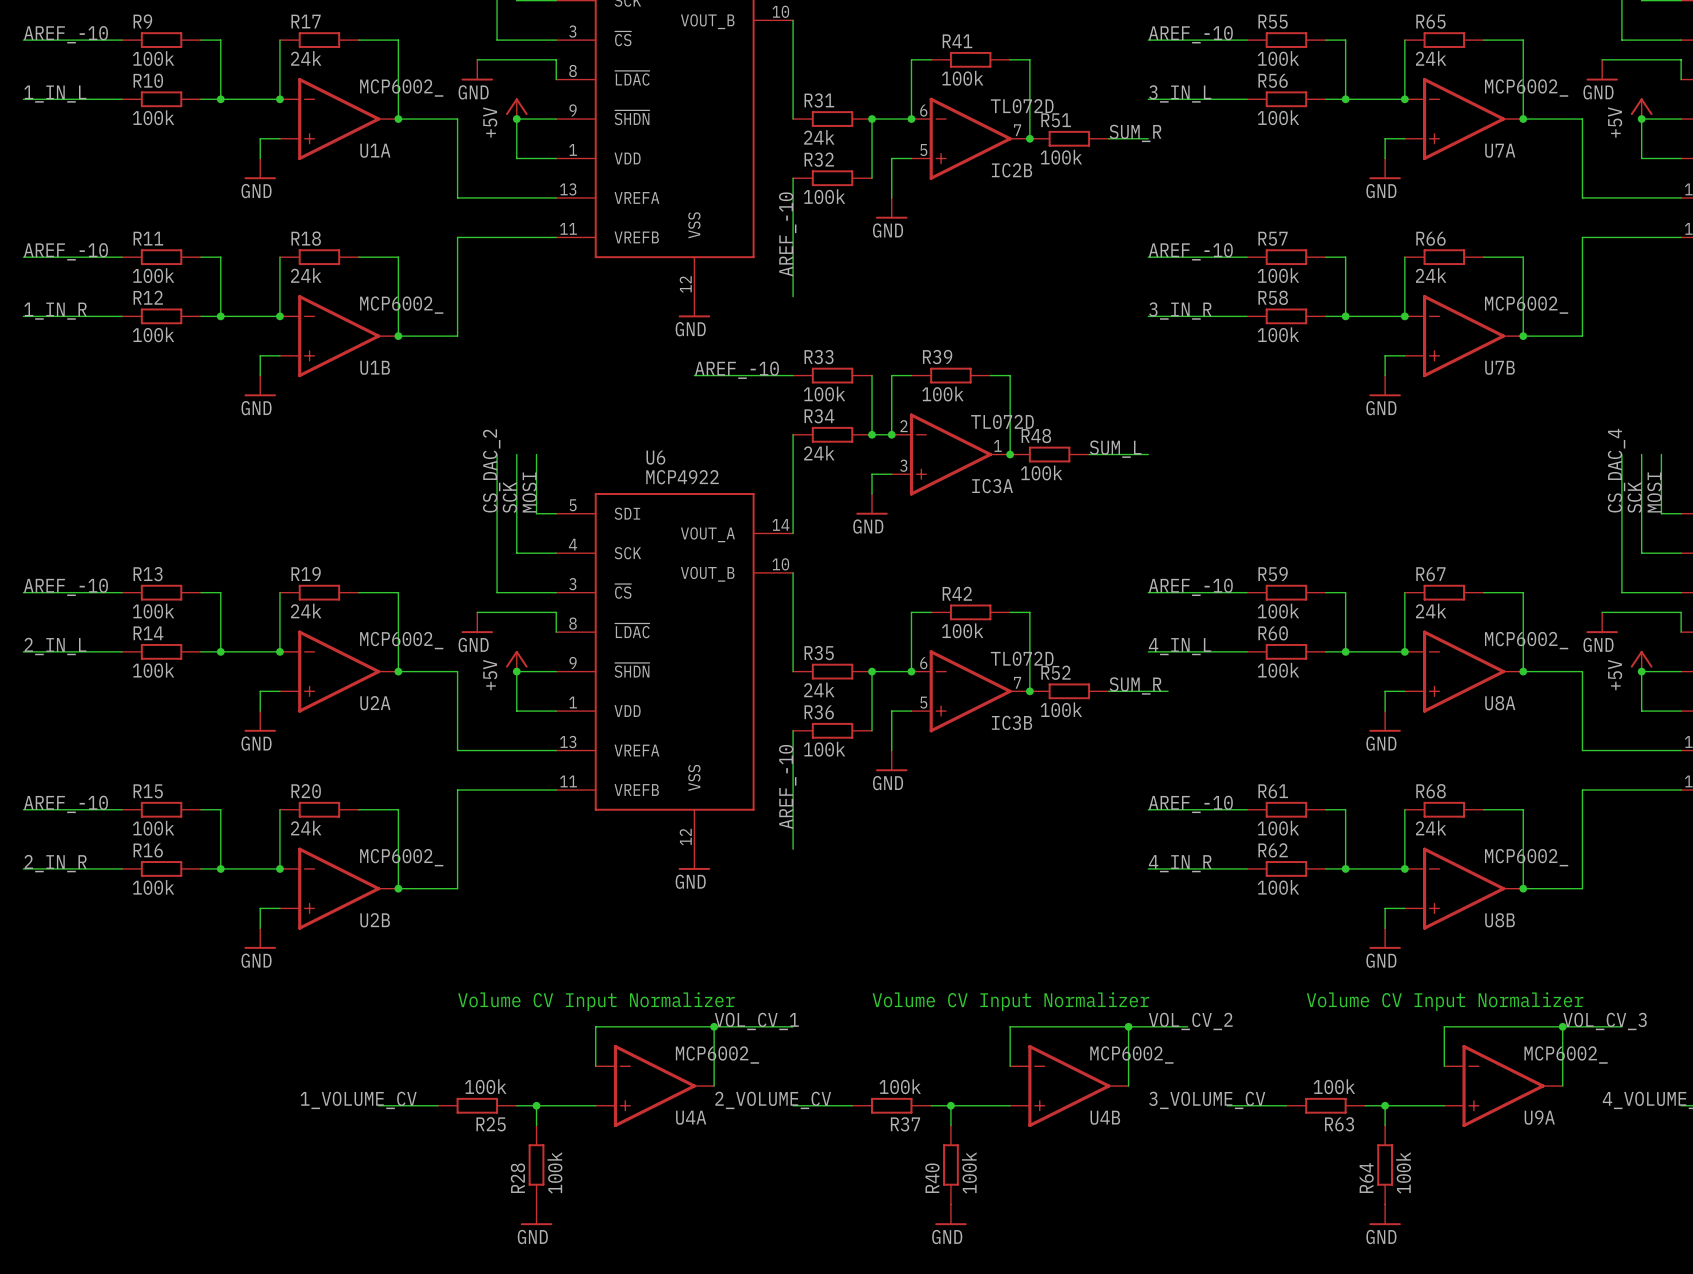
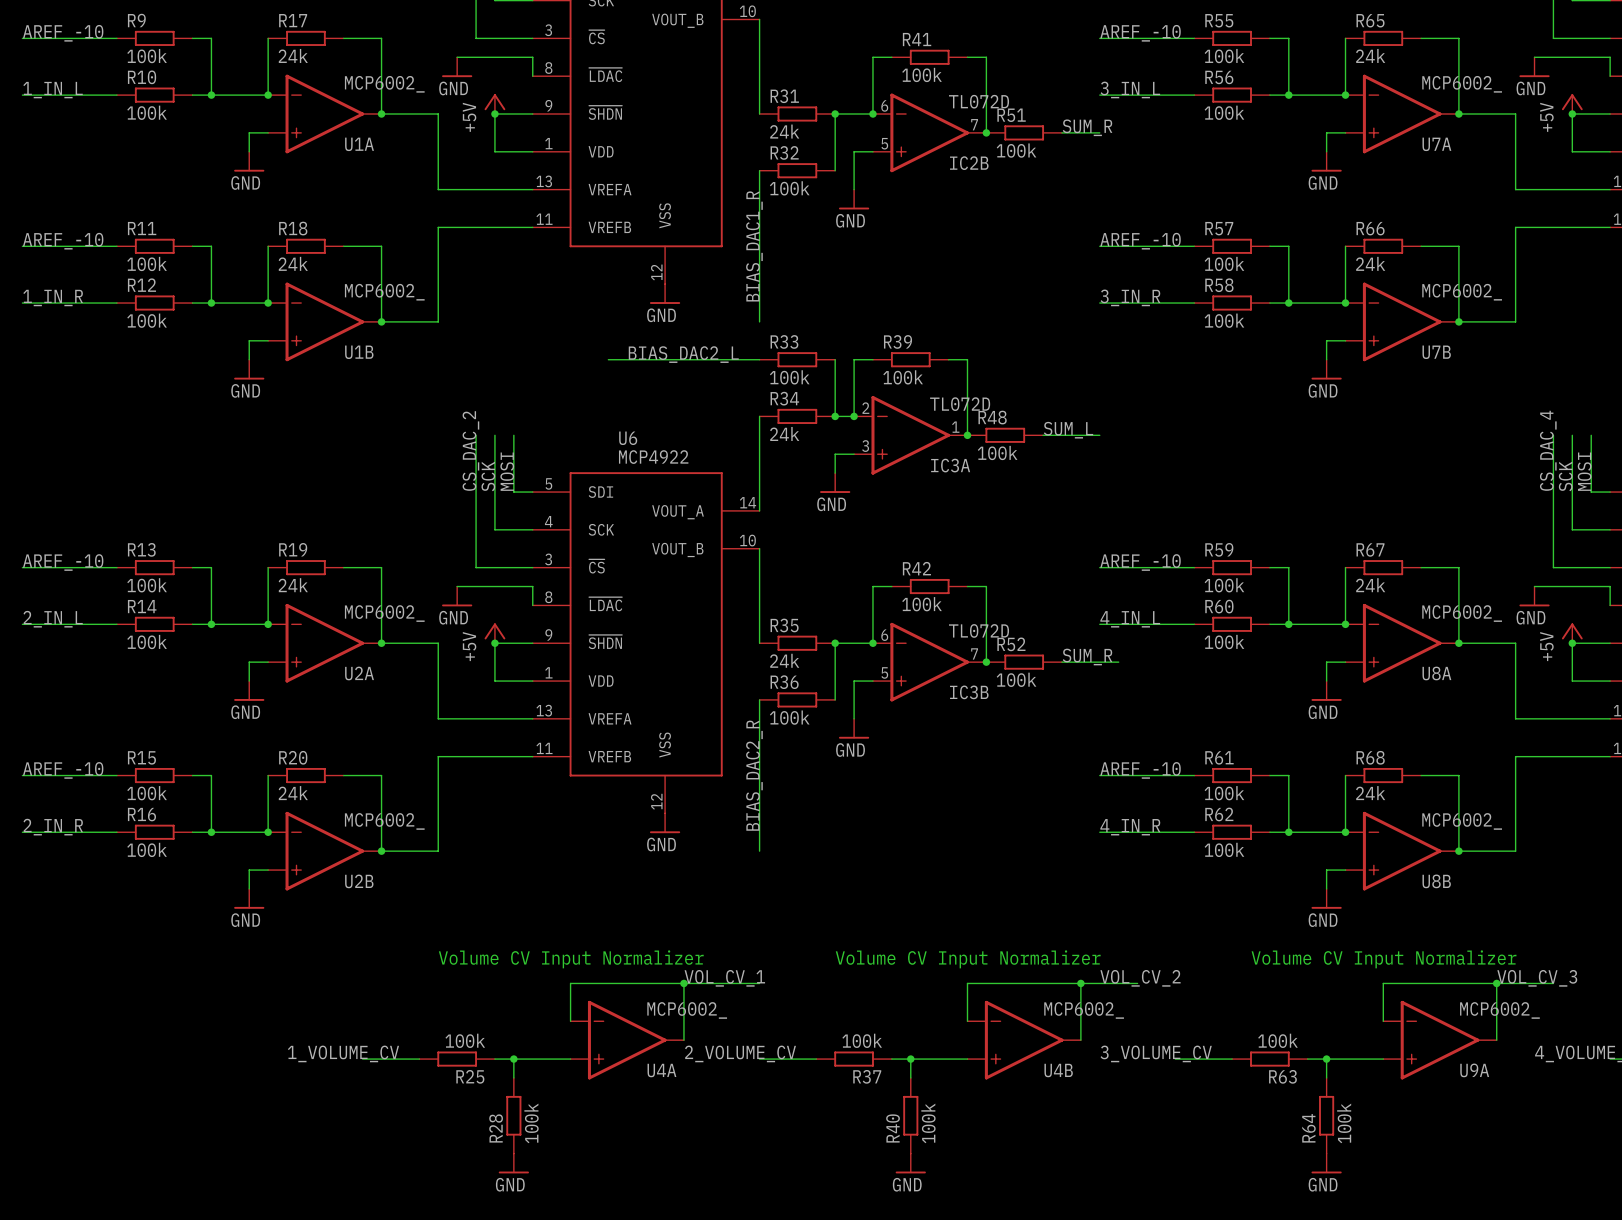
label: AREF_-10 (787, 234) -> none
label: none -> BIAS_DAC1_R (754, 246)
wire: none -> (759, 284) (759, 321)
label: none -> BIAS_DAC2_L (683, 354)
label: AREF_-10 (736, 370) -> none
wire: none -> (608, 359) (665, 359)
label: AREF_-10 (787, 786) -> none
label: none -> BIAS_DAC2_R (754, 775)
wire: none -> (759, 813) (759, 851)

